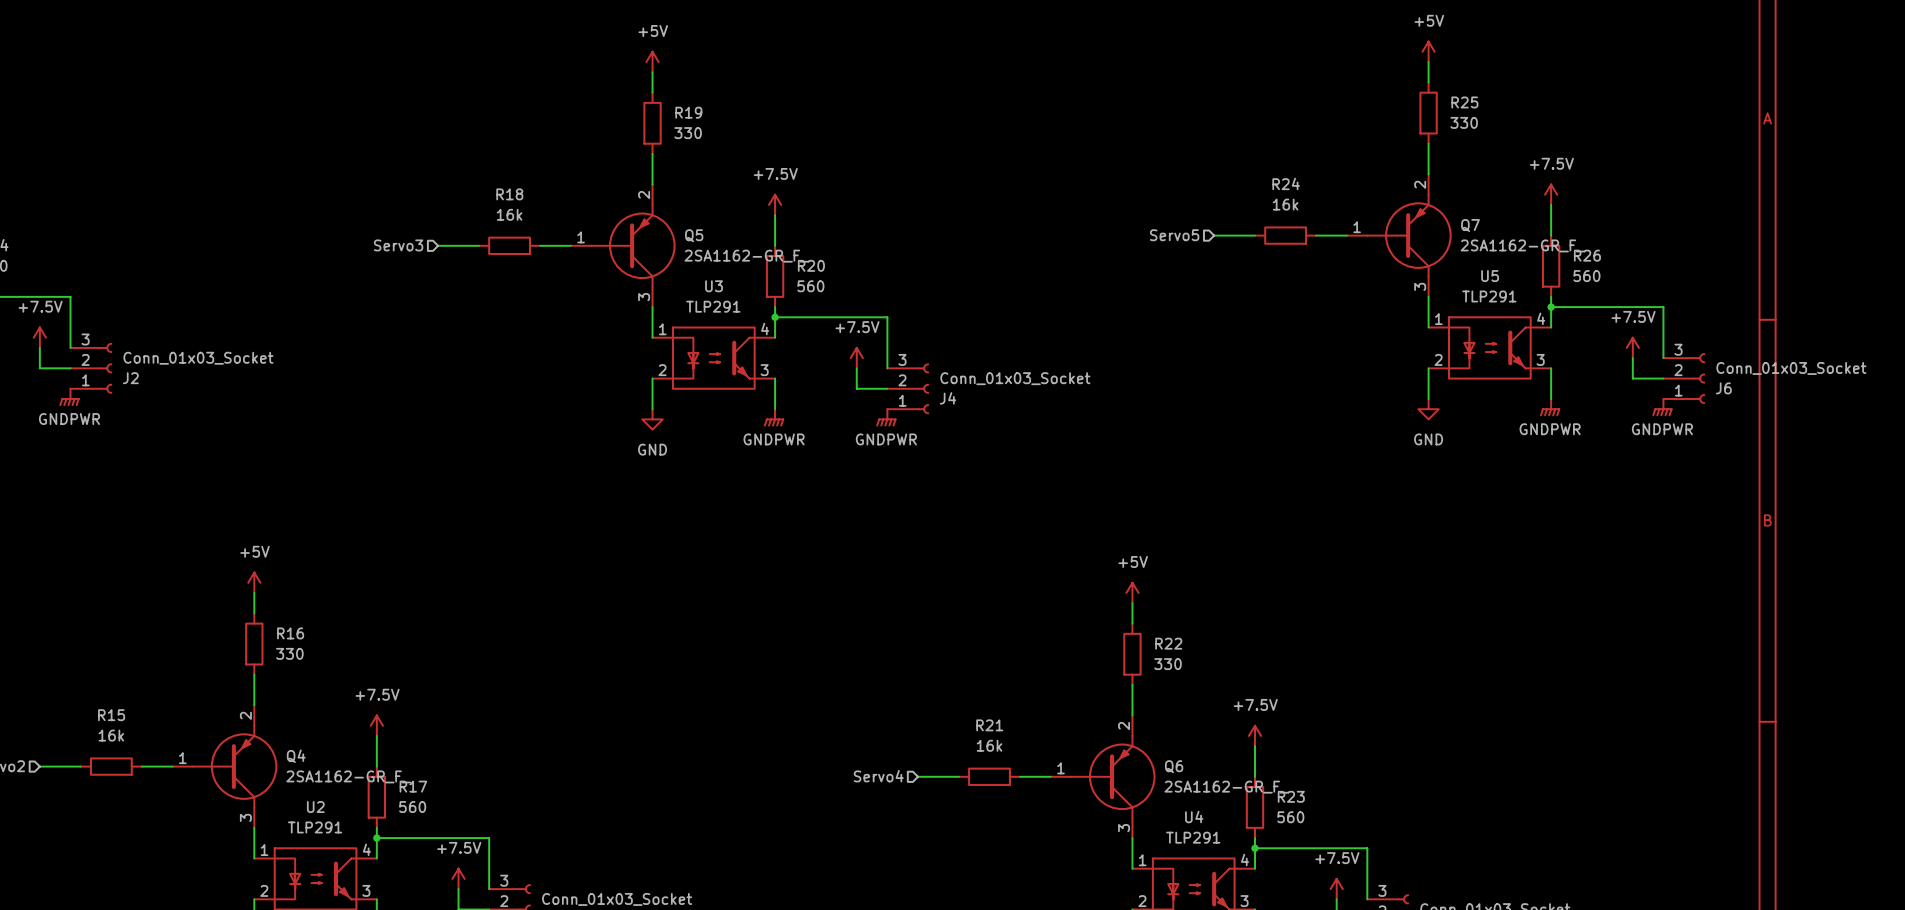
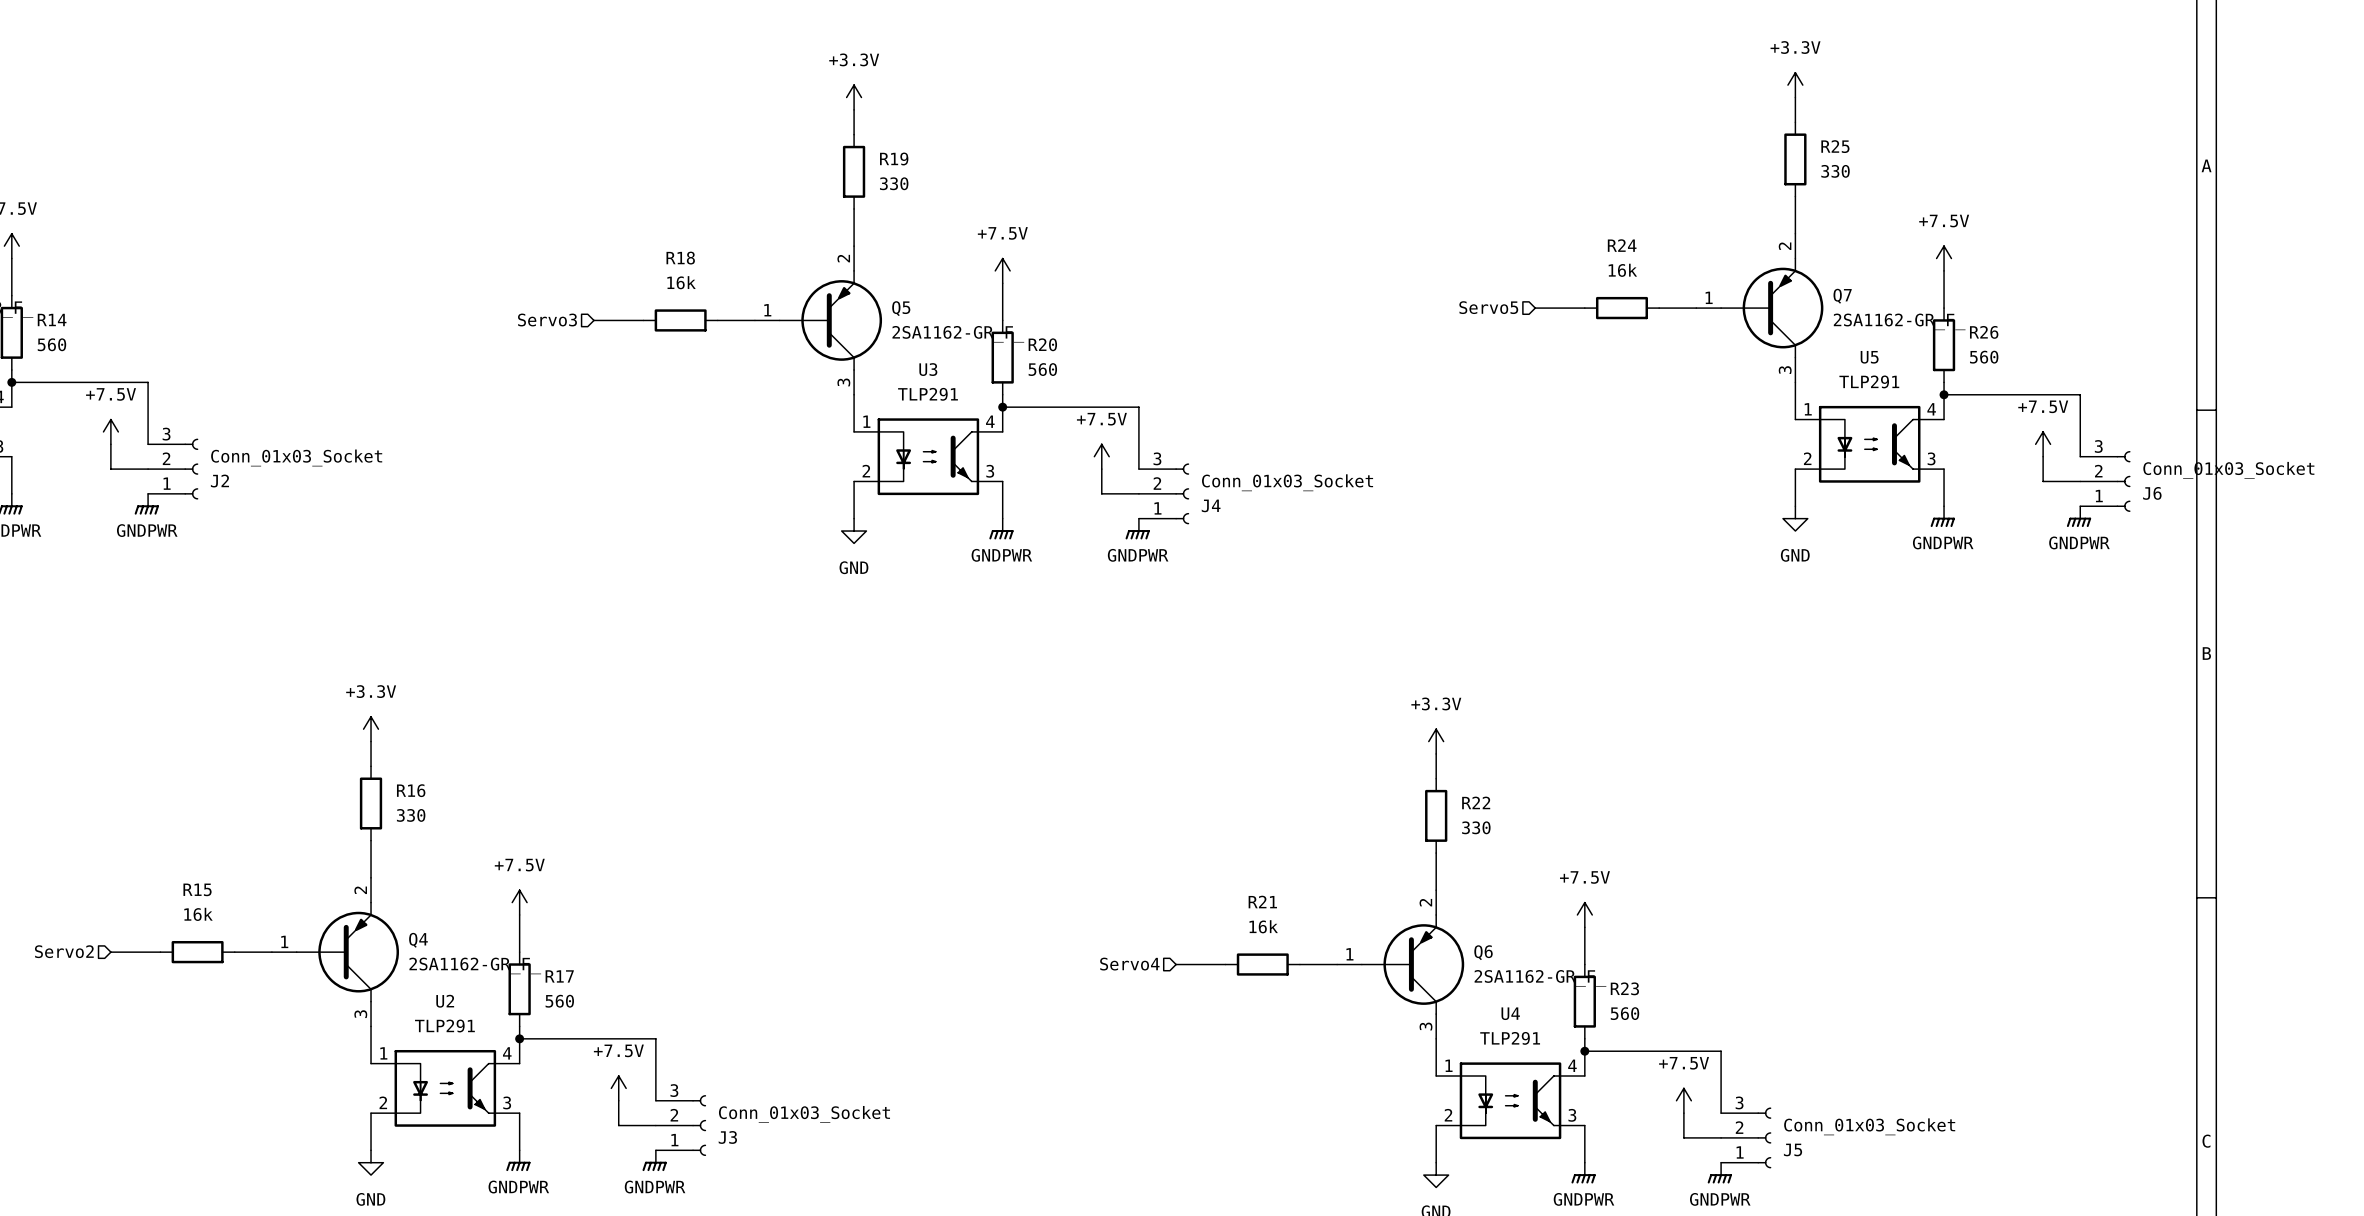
power symbol: +5V (1428, 51) -> +3.3V (1795, 85)
power symbol: +5V (652, 62) -> +3.3V (854, 97)
power symbol: +5V (254, 582) -> +3.3V (371, 729)
power symbol: +5V (1132, 592) -> +3.3V (1436, 741)

